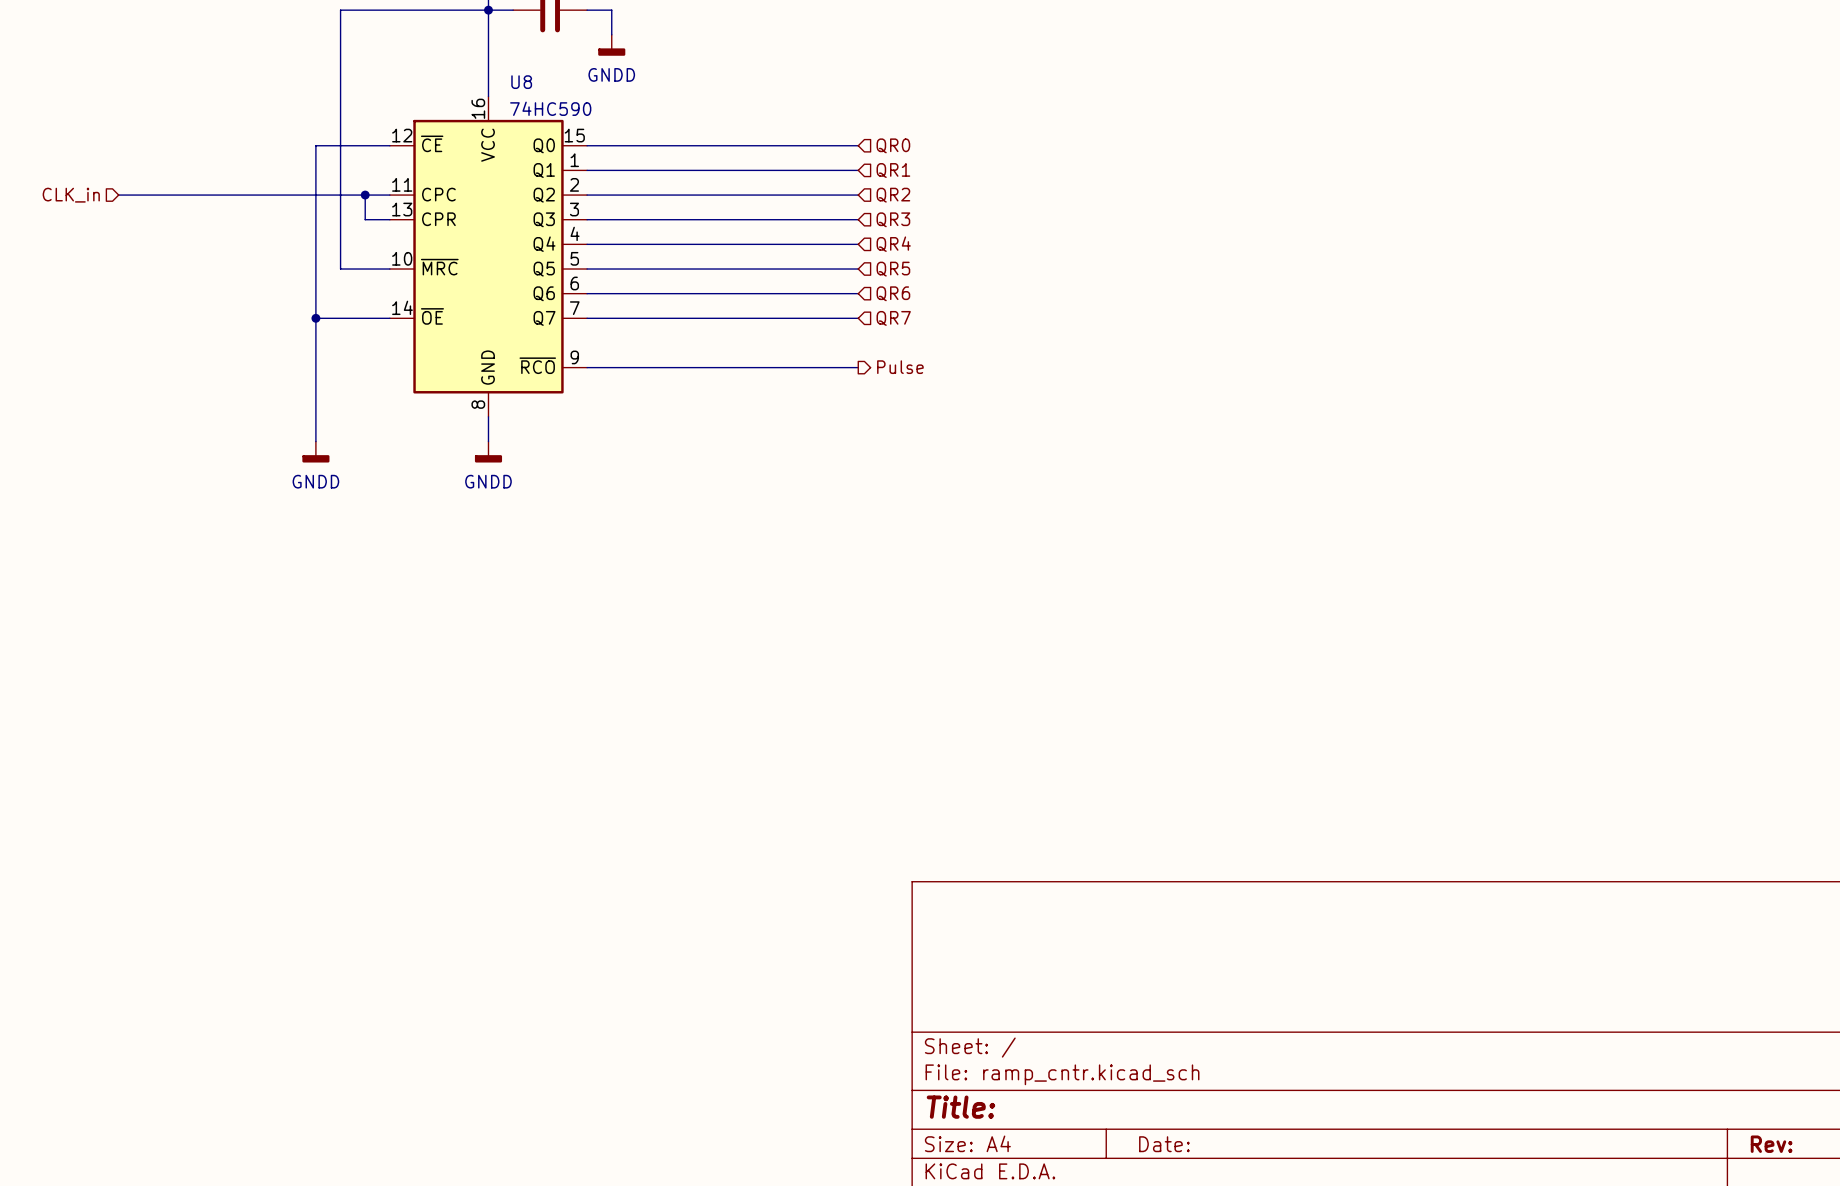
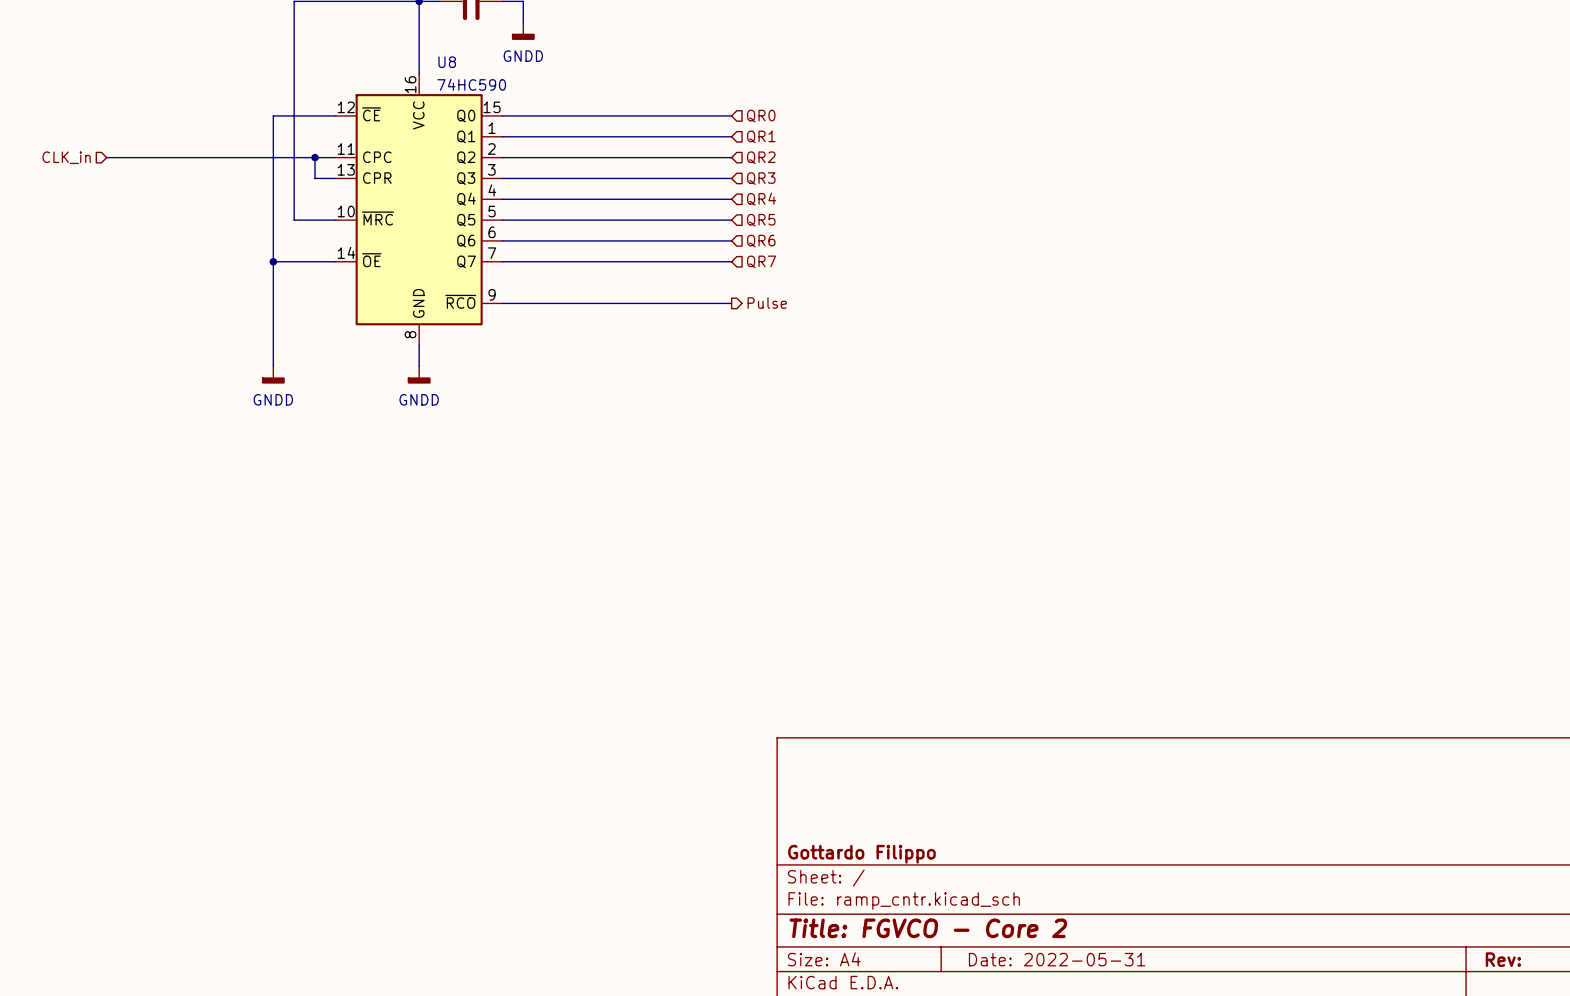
title block: none -> Gottardo Filippo (861, 854)
title block: Title: (960, 1107) -> Title: FGVCO - Core 2 (928, 928)
title block: Date: (1164, 1144) -> Date: 2022-05-31 (1057, 959)

